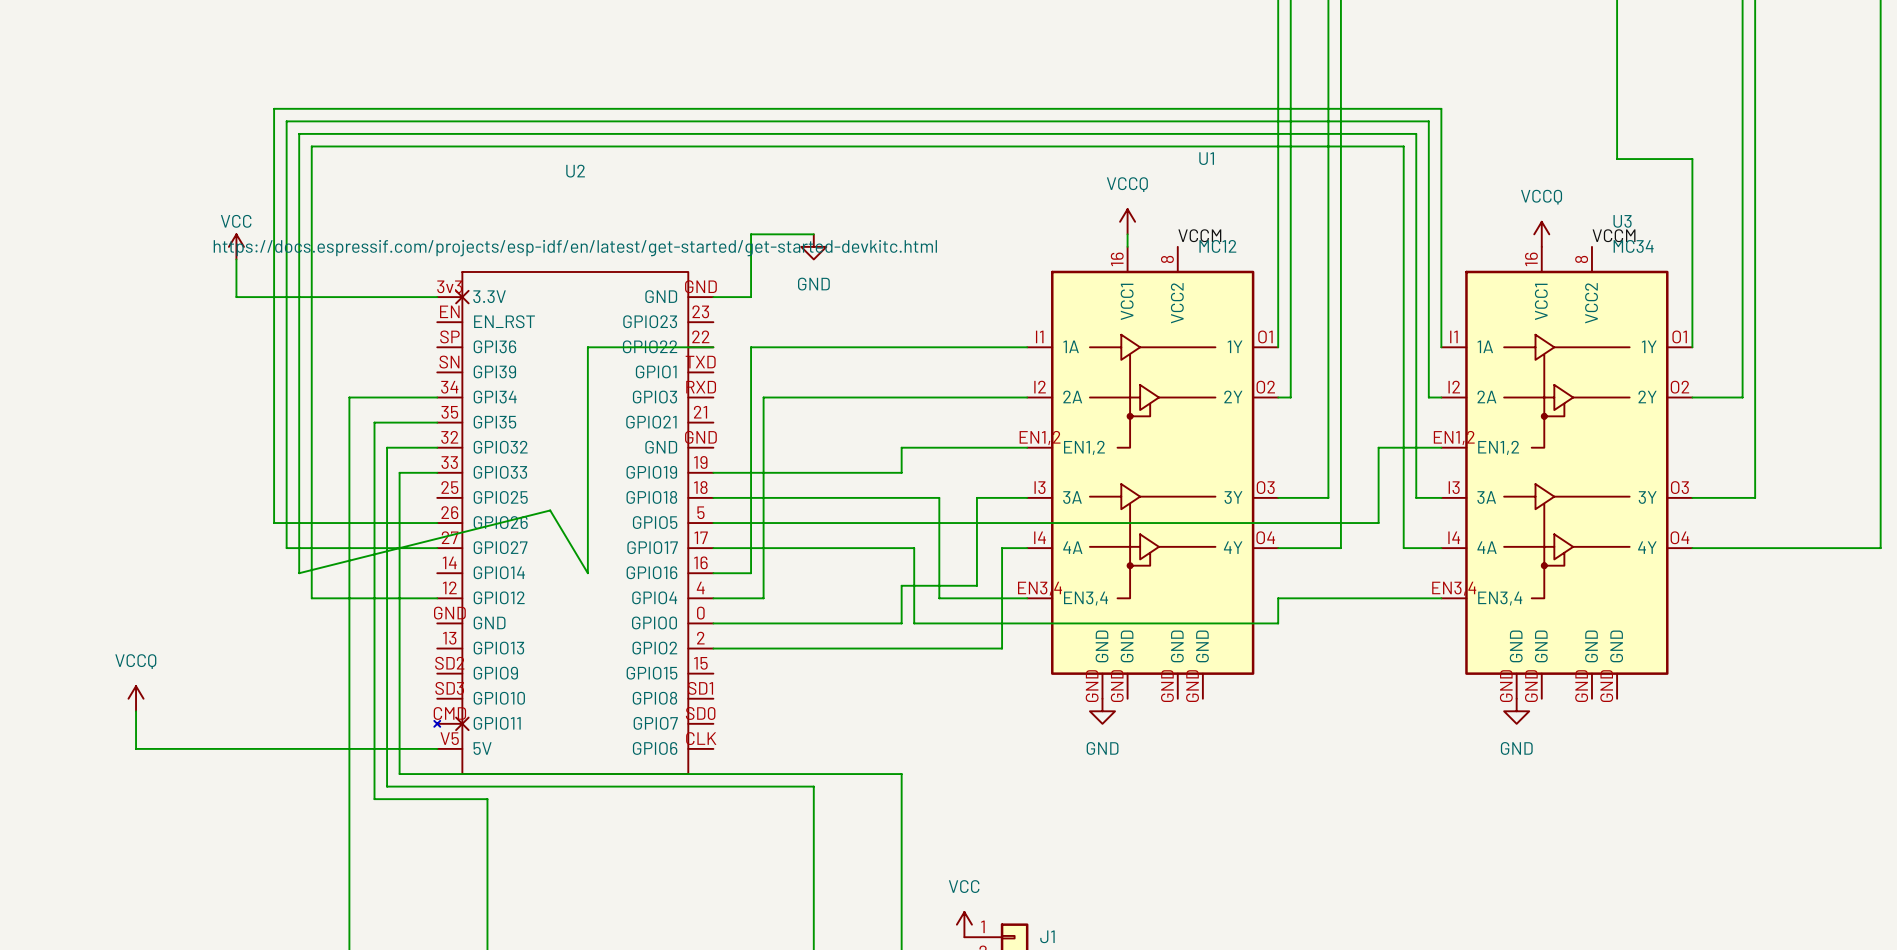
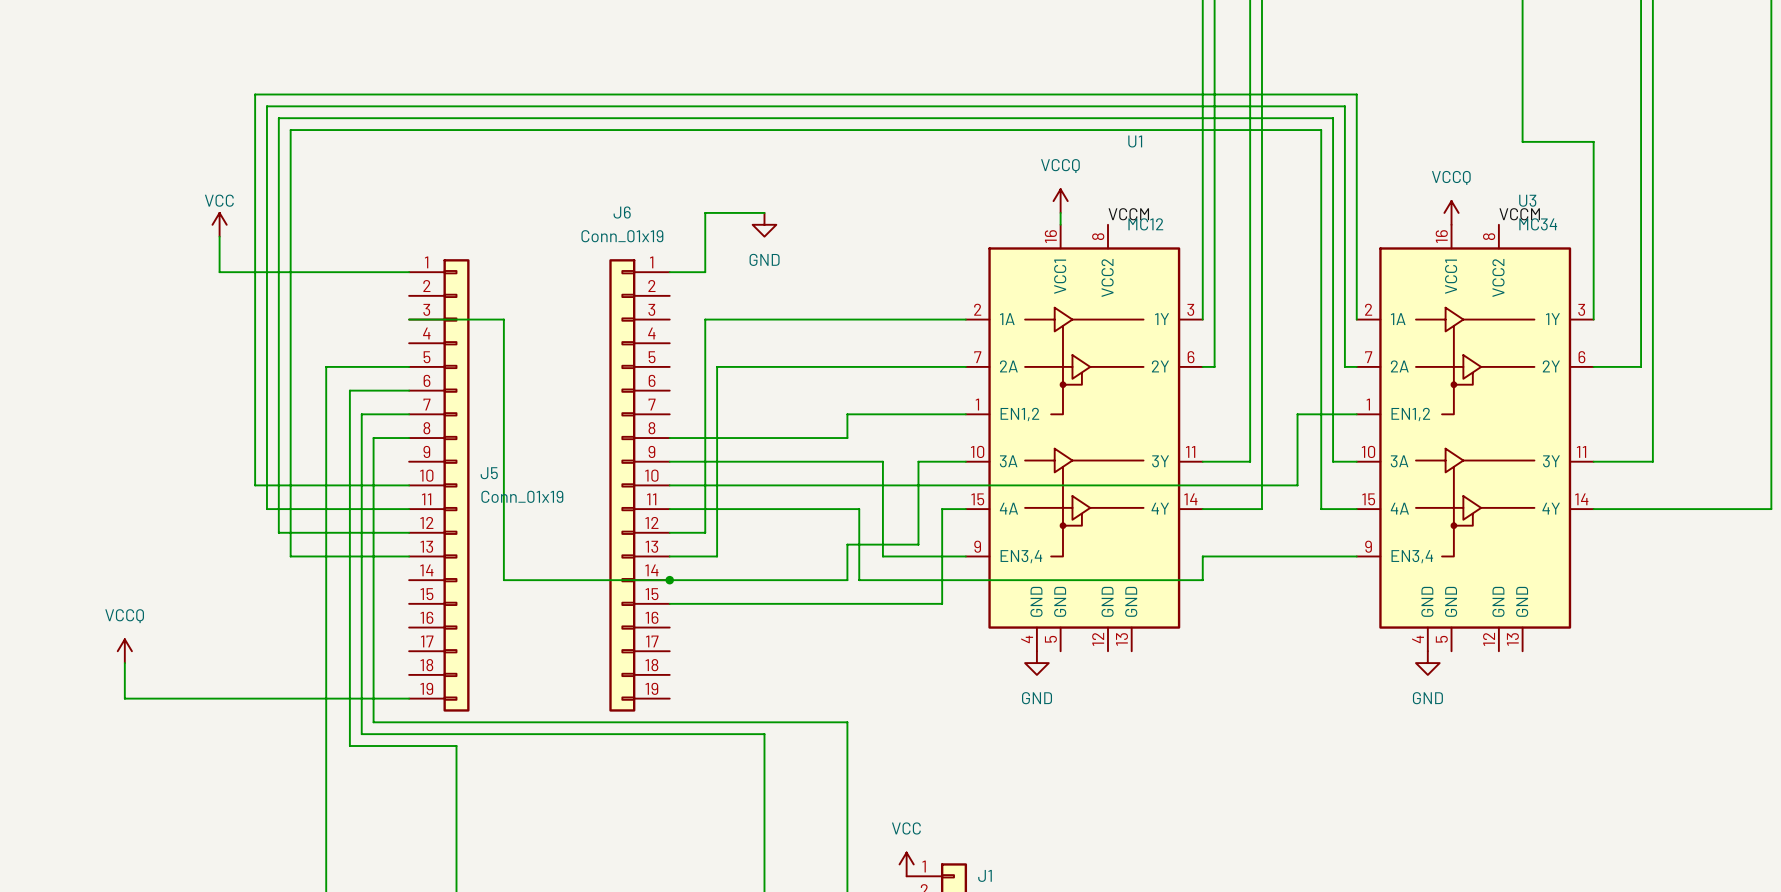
U1 symbol: [1027, 246, 1279, 699] -> [965, 224, 1203, 652]
U3 symbol: [1441, 246, 1693, 699] -> [1356, 224, 1594, 652]
wire: none -> (409, 319) (503, 319) (503, 580) (669, 580)
wire: (713, 347) (587, 347) (587, 573) (550, 510) (299, 573) -> (409, 532) (278, 532)
J5: none -> Conn_01x19 (439, 485)
U2: (573, 523) -> none
J6: none -> Conn_01x19 (639, 485)
junction: none -> (669, 580)

